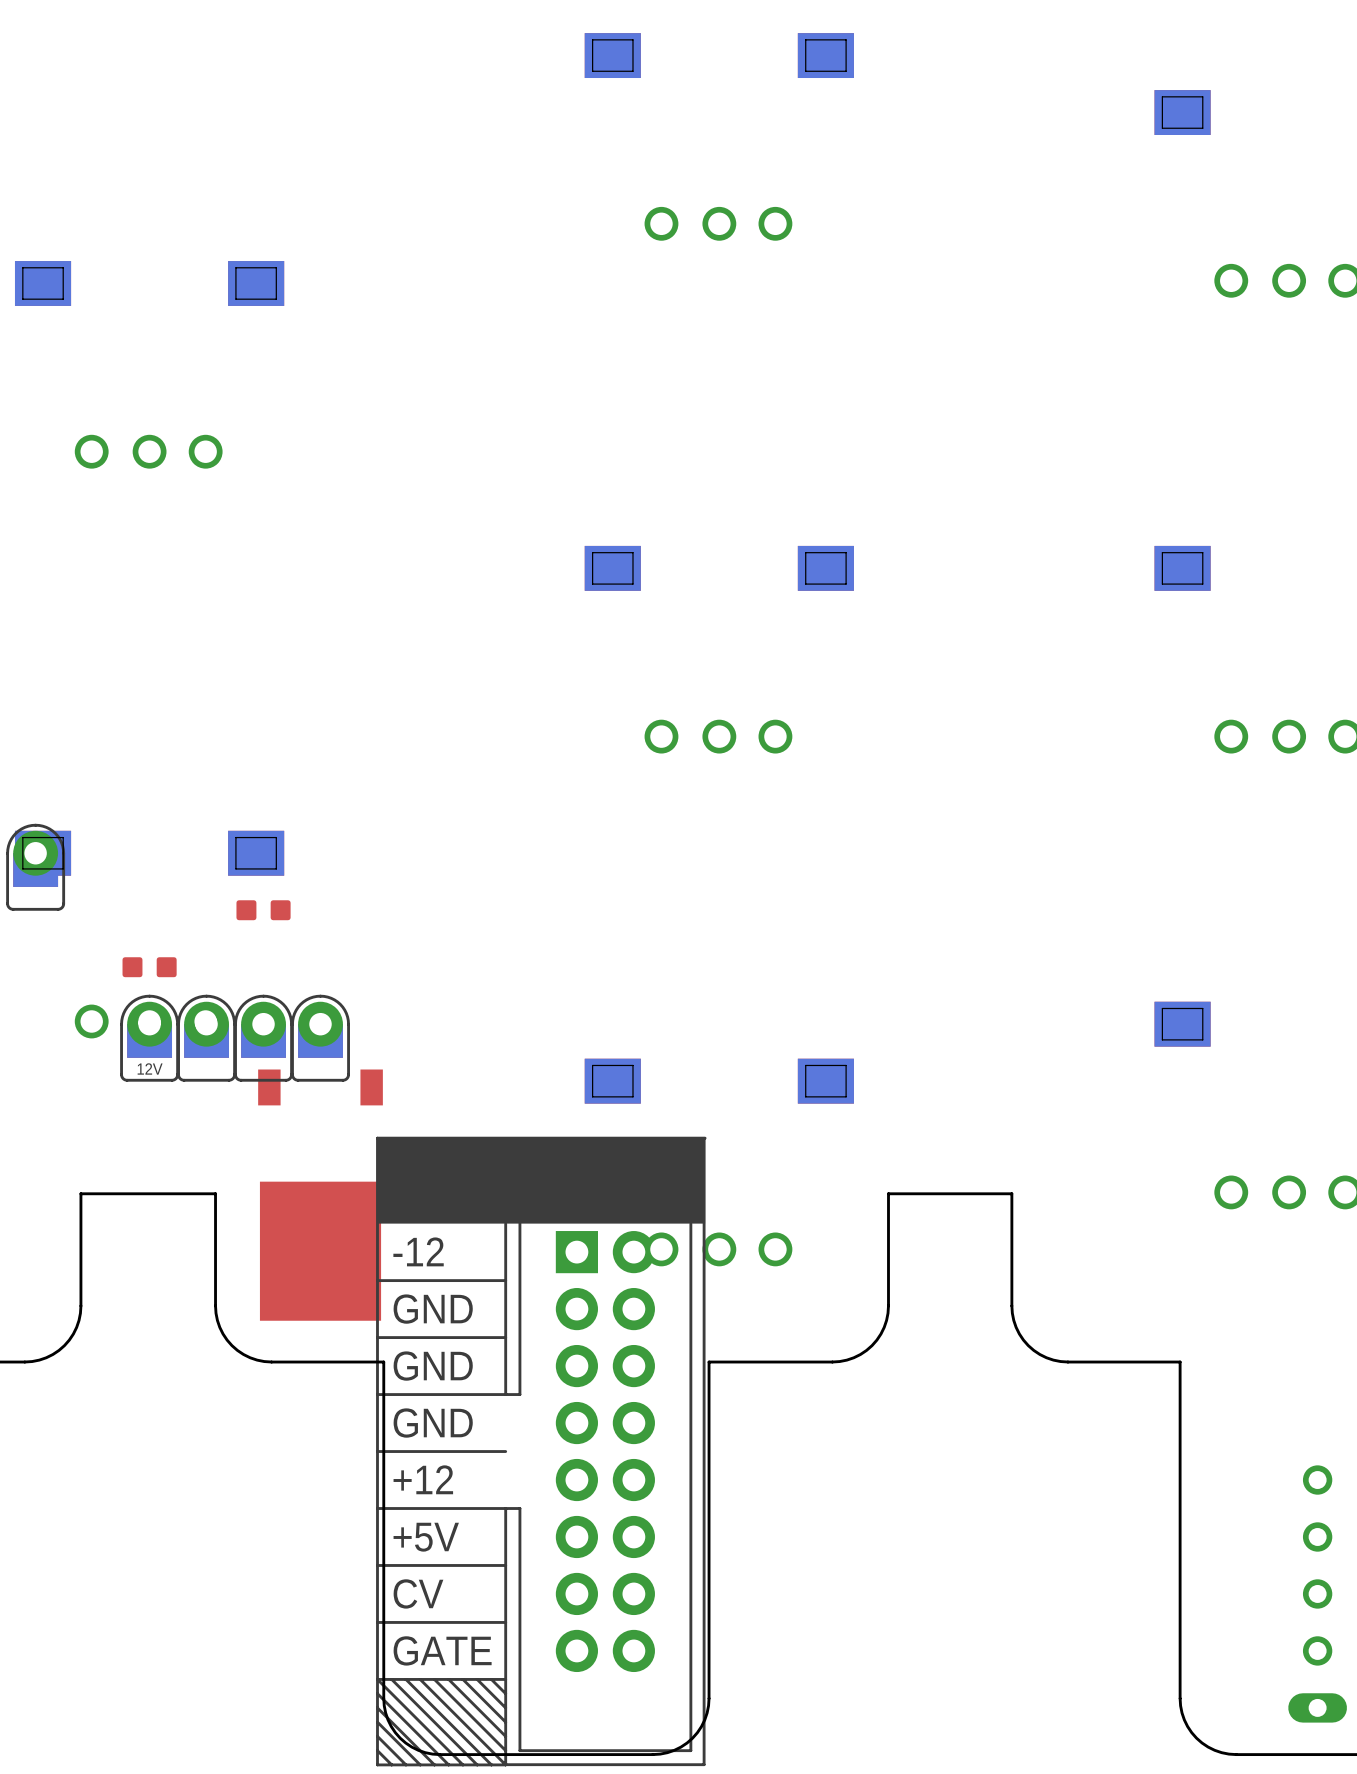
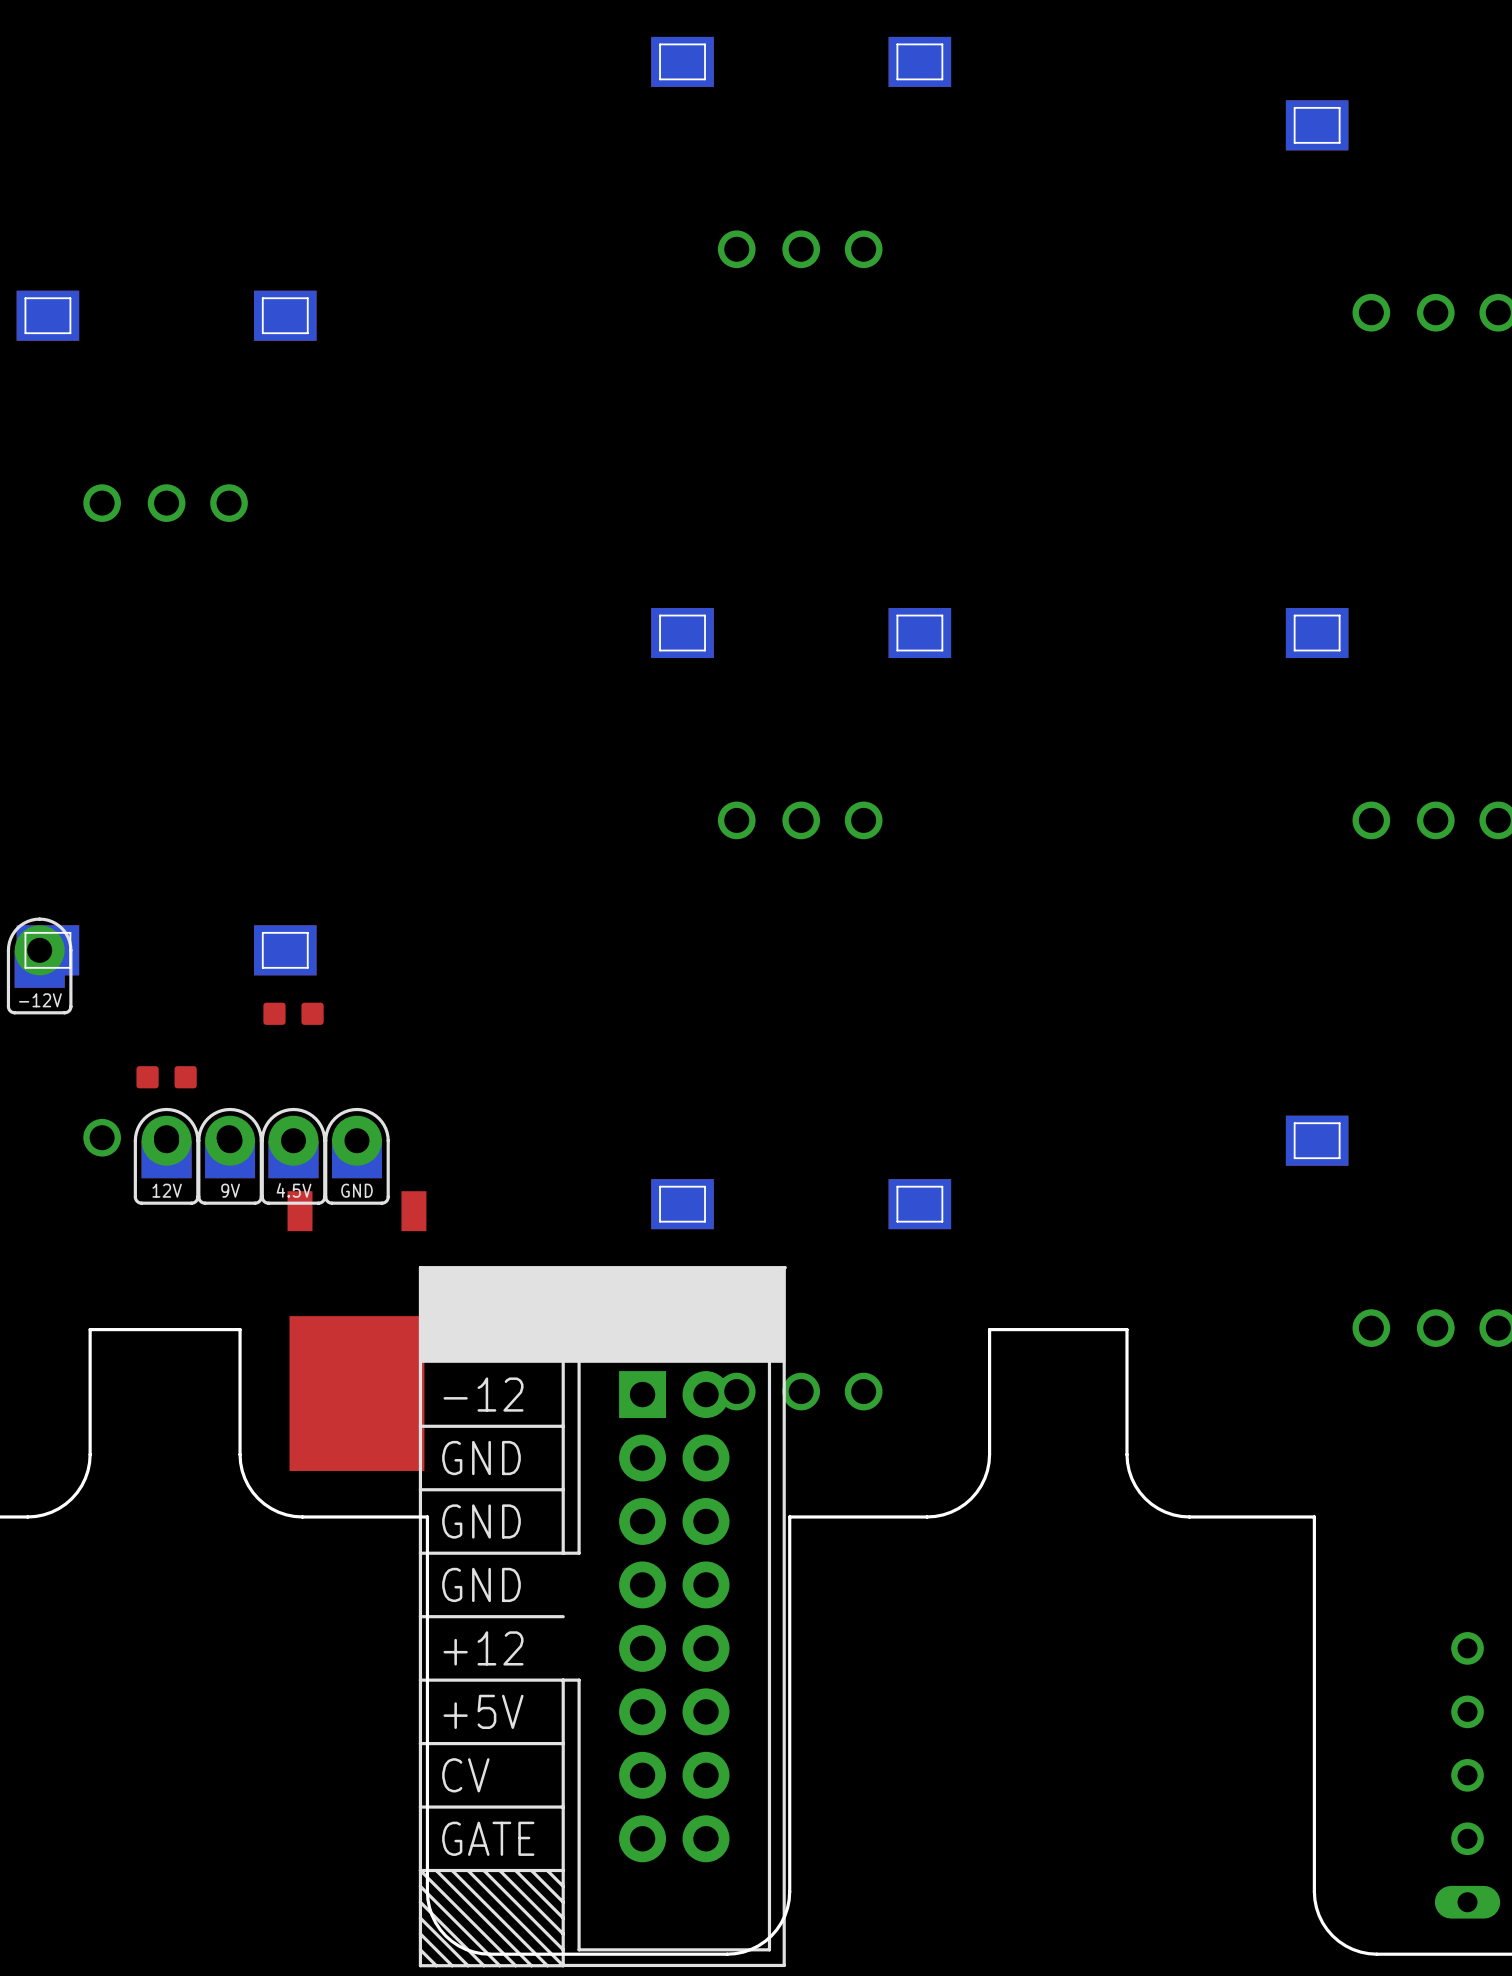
part text: none -> -12V (40, 1000)
part text: none -> 9V (230, 1190)
part text: none -> 4.5V (294, 1190)
part text: none -> GND (356, 1190)

